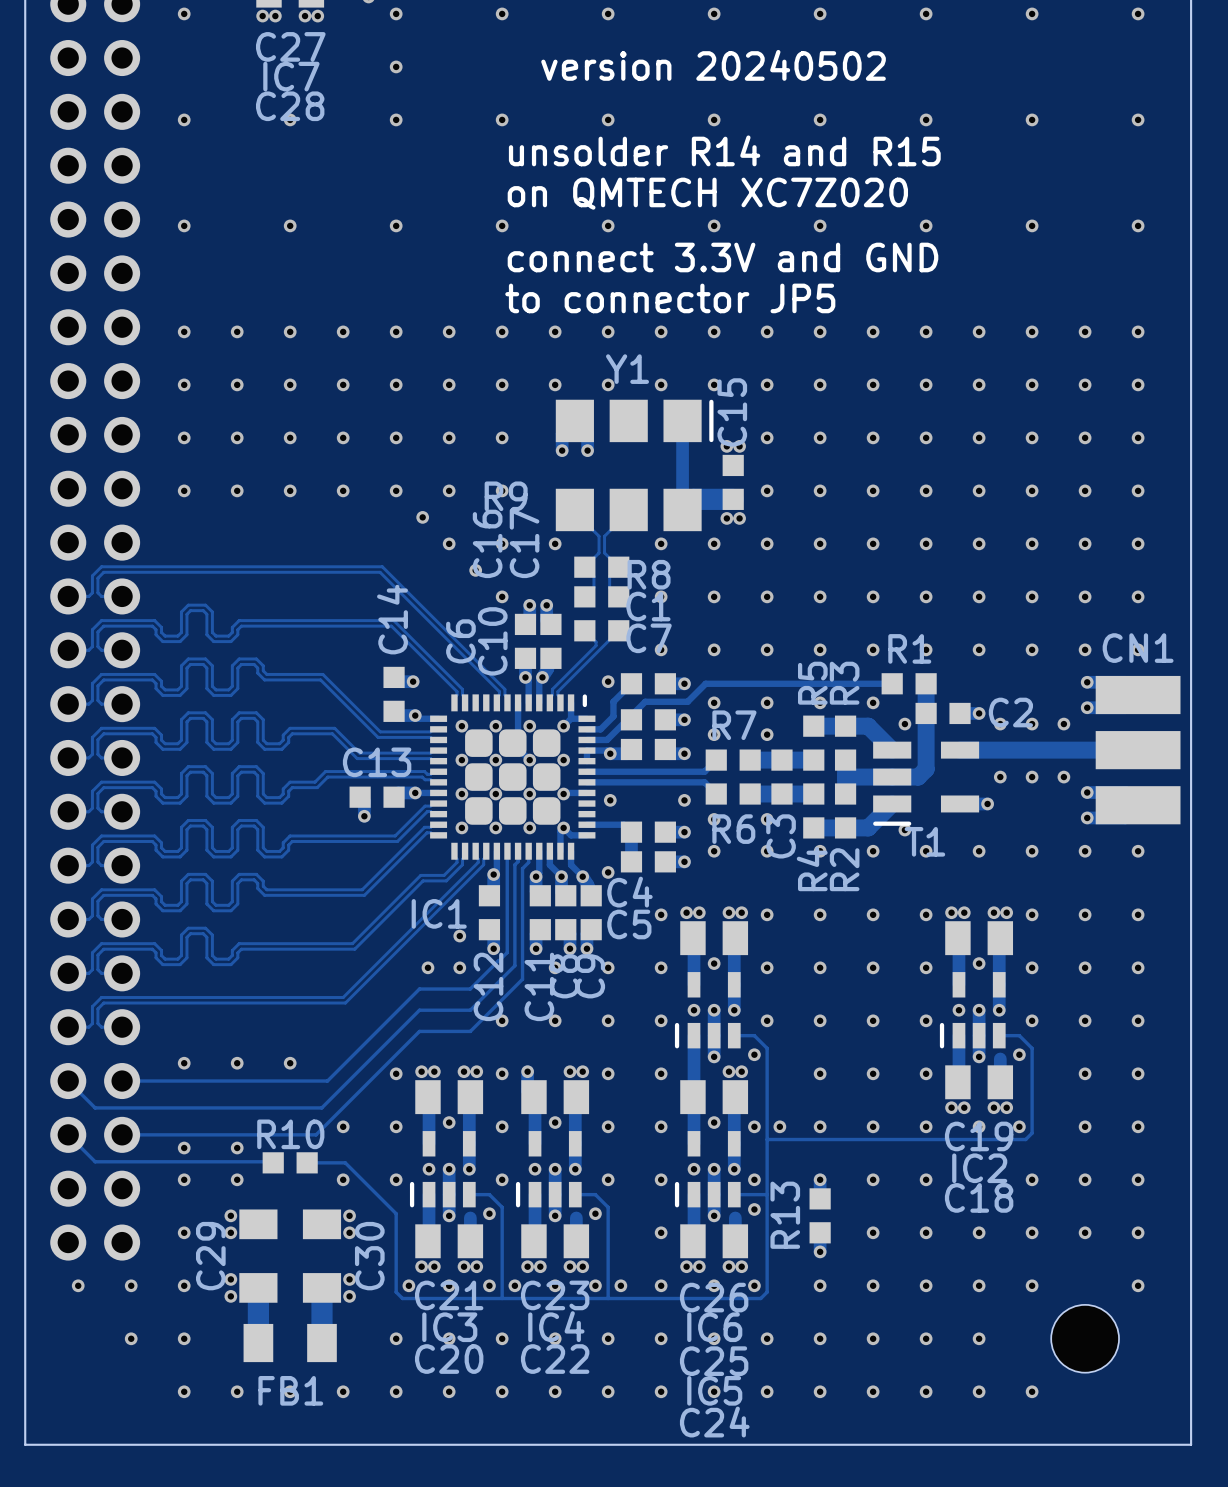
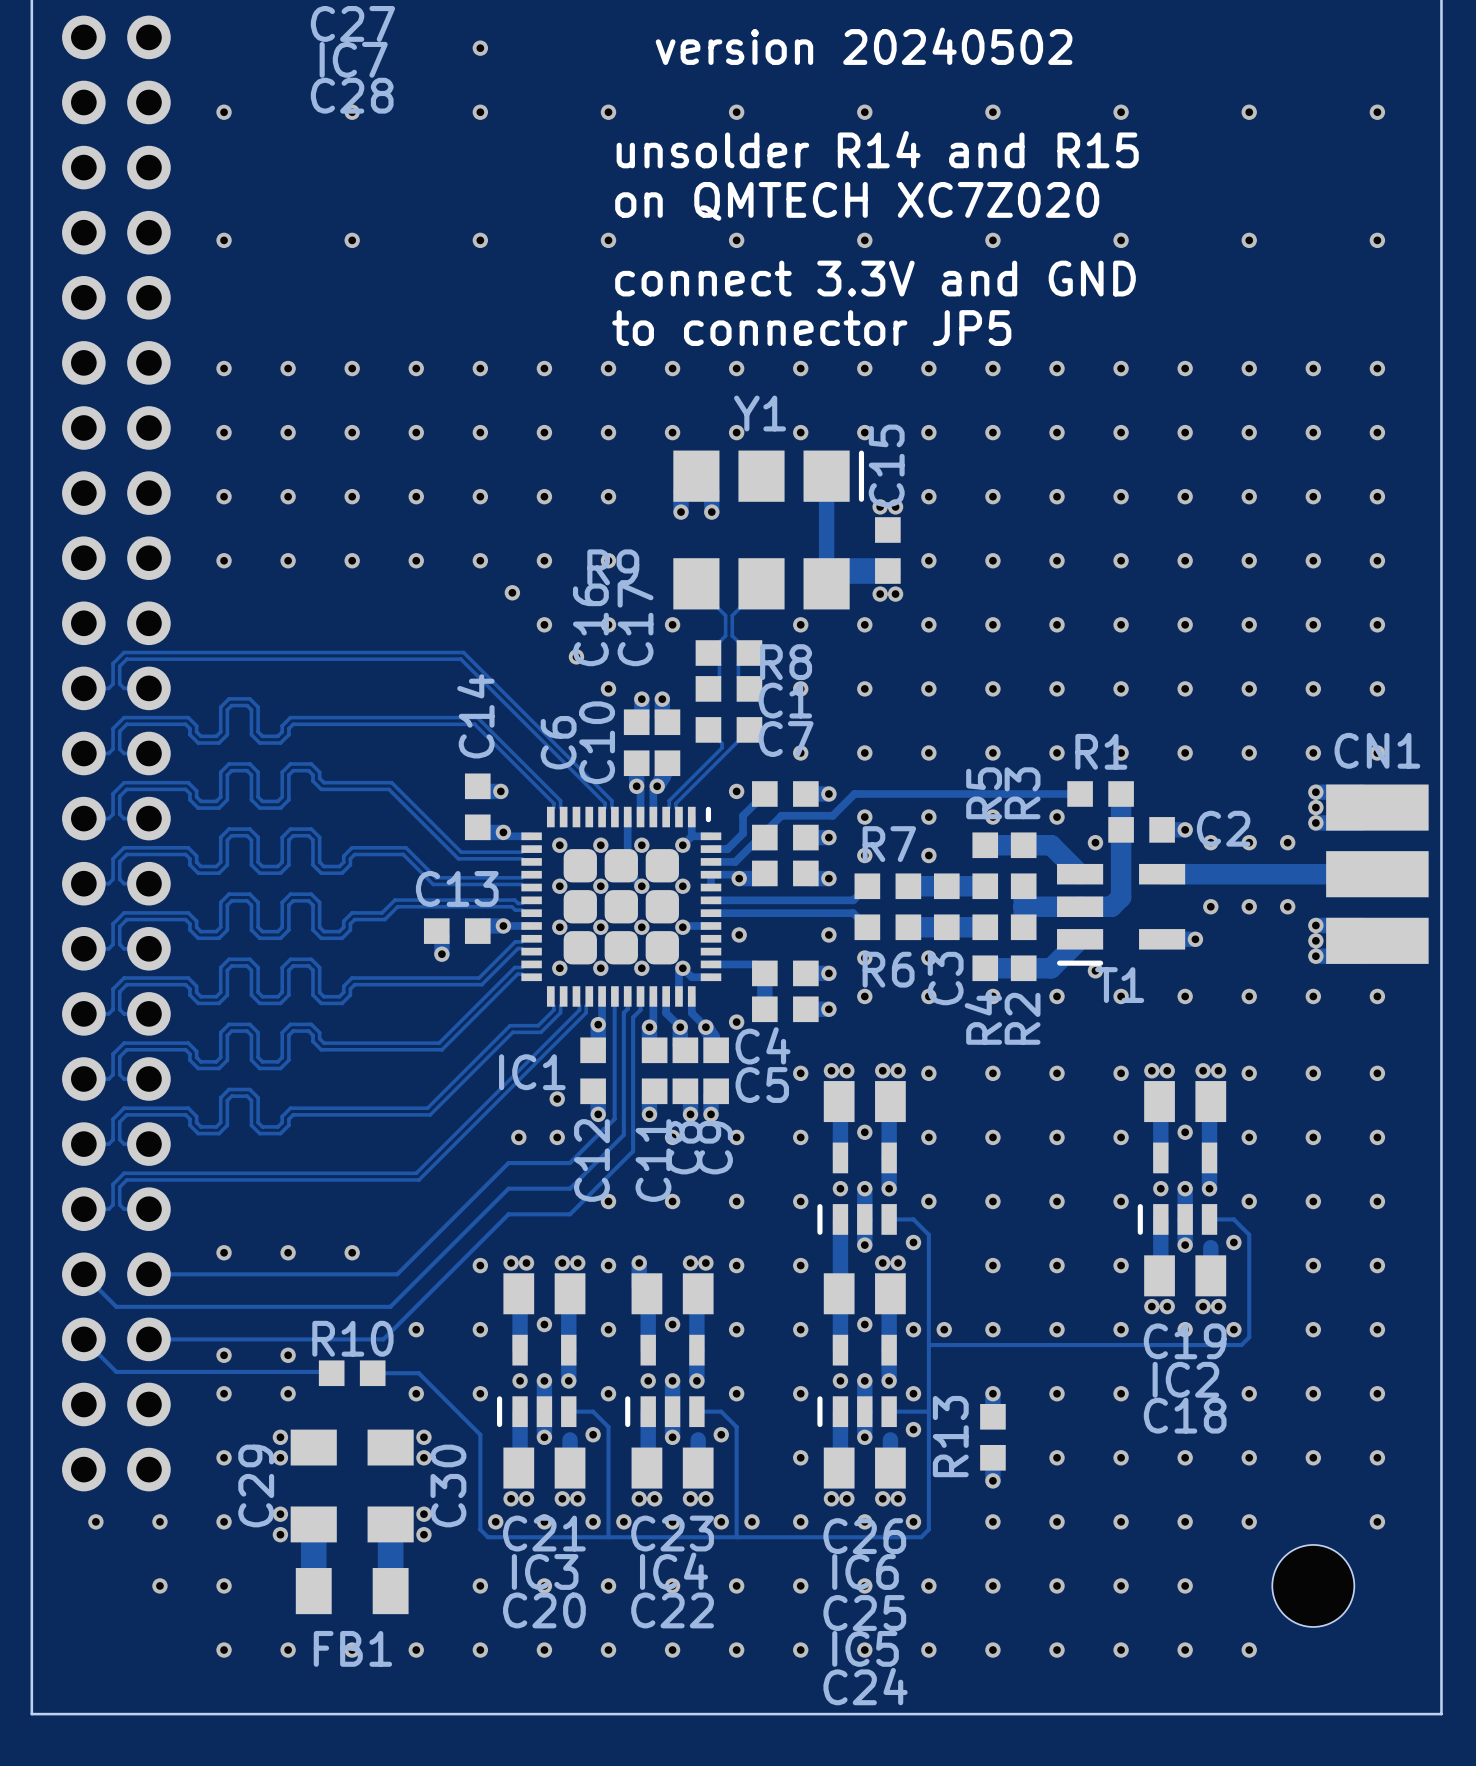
via: none -> (1315, 807)
via: none -> (1315, 940)

